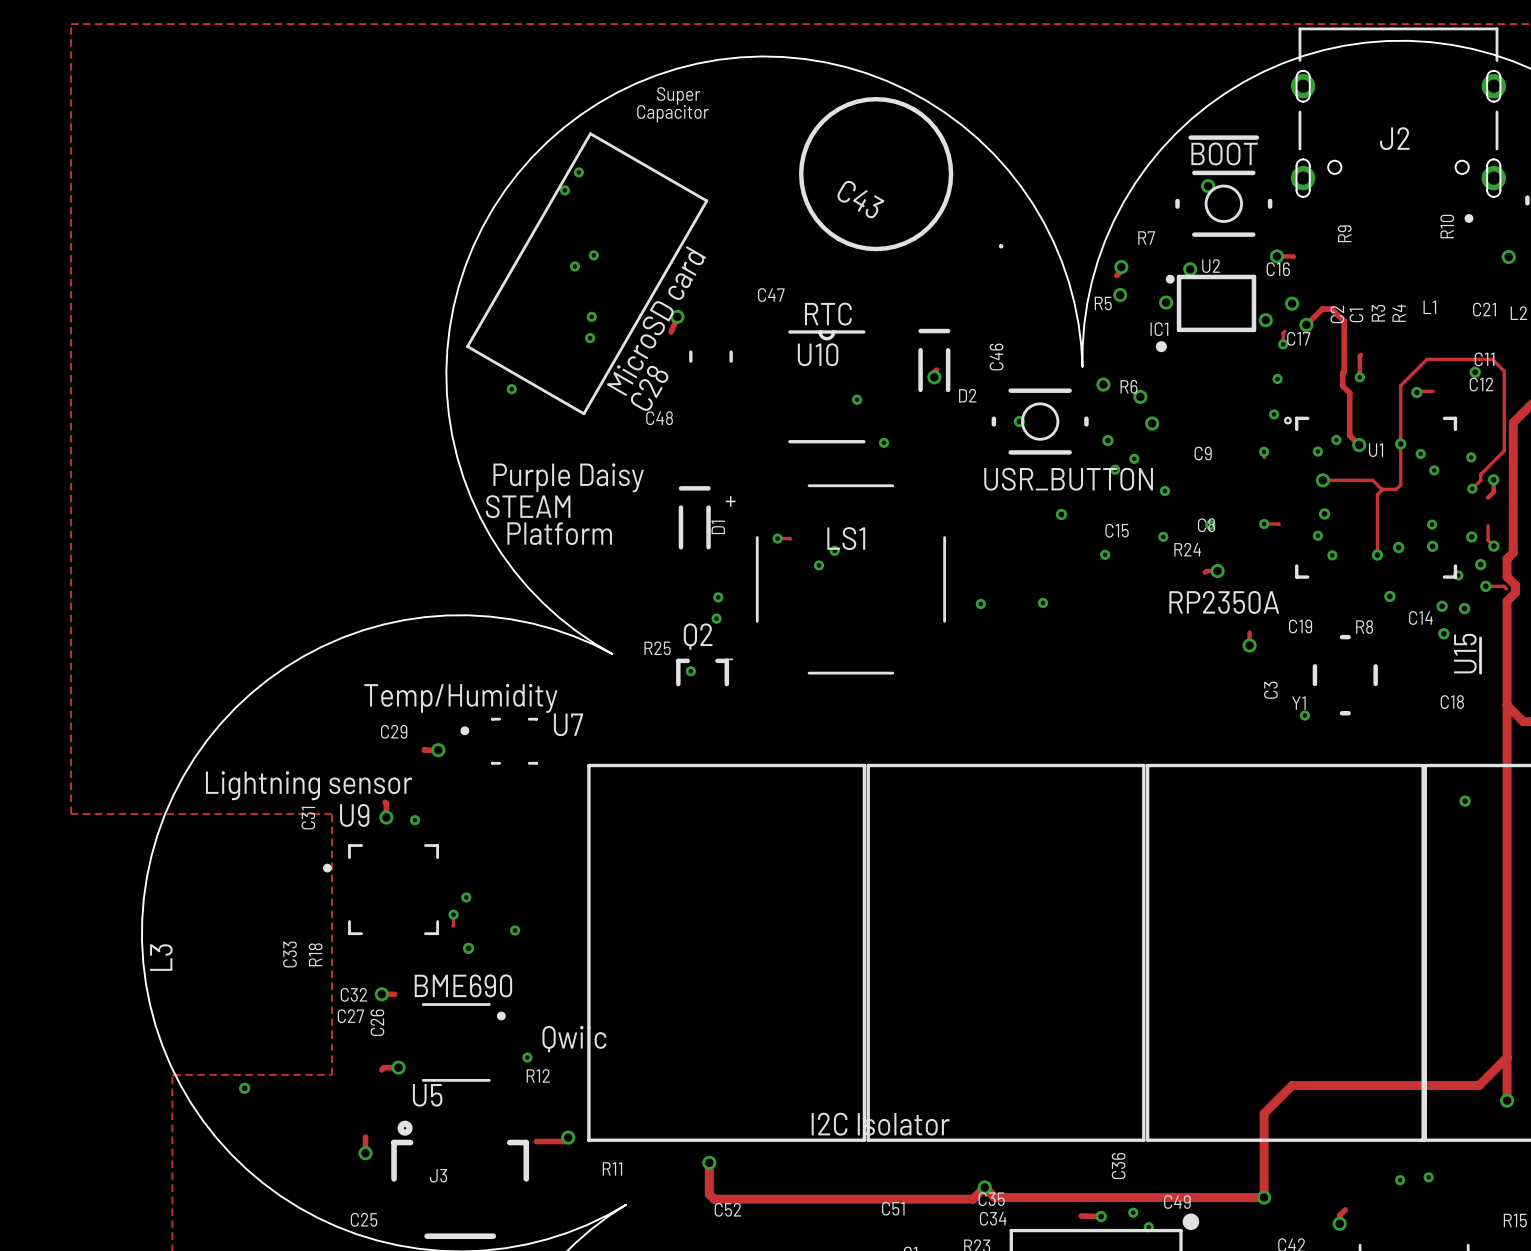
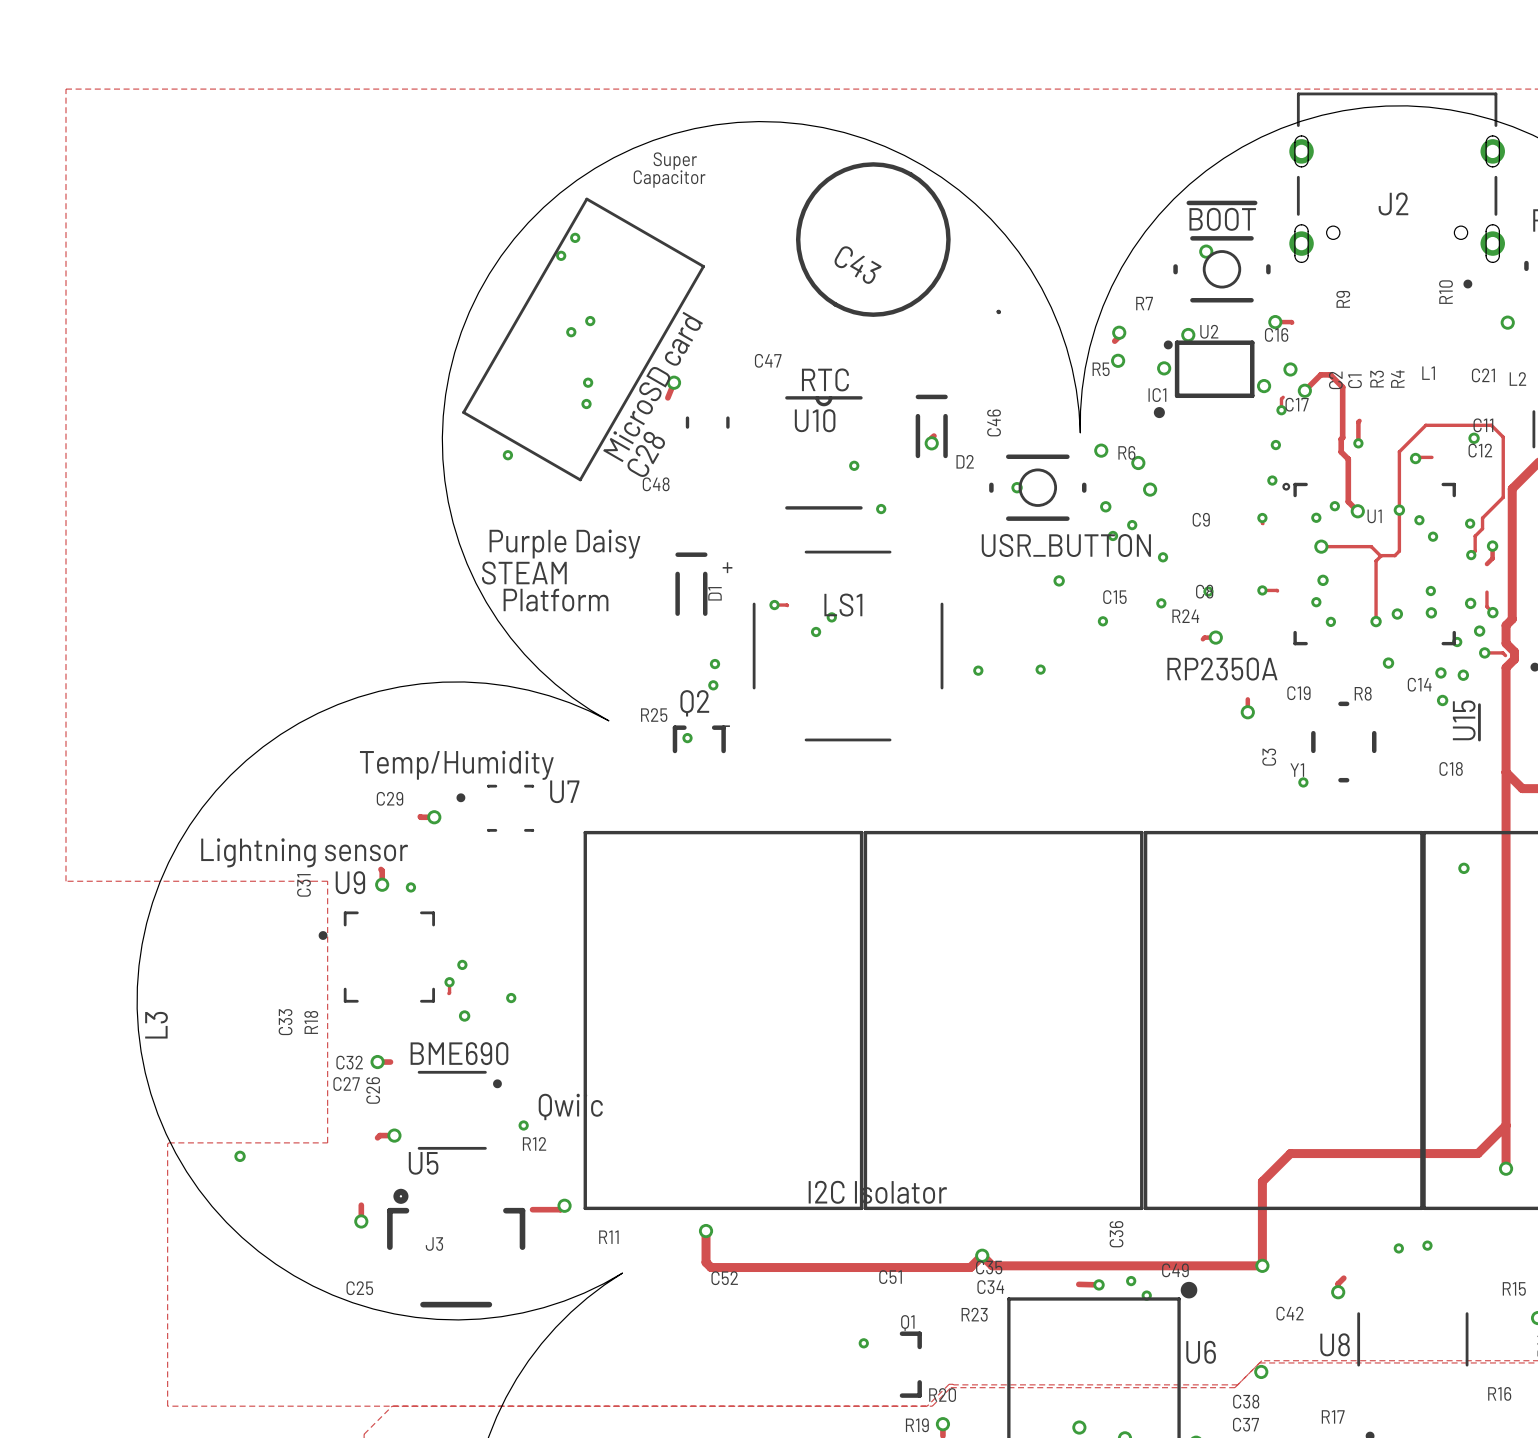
track: (1504, 431) (1504, 450) (1480, 474) (1480, 480) (1476, 484) -> (1503, 497) (1482, 518) (1482, 528) (1475, 536) (1475, 551)

